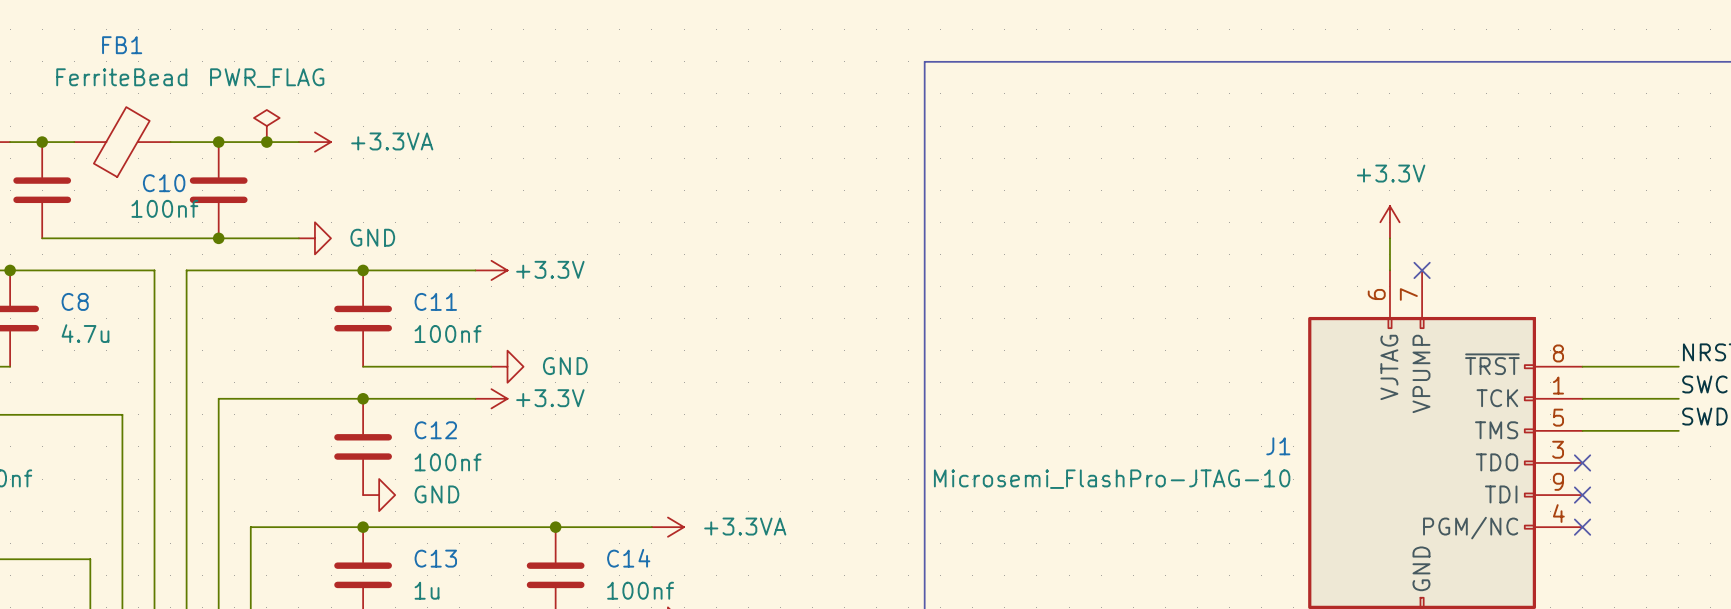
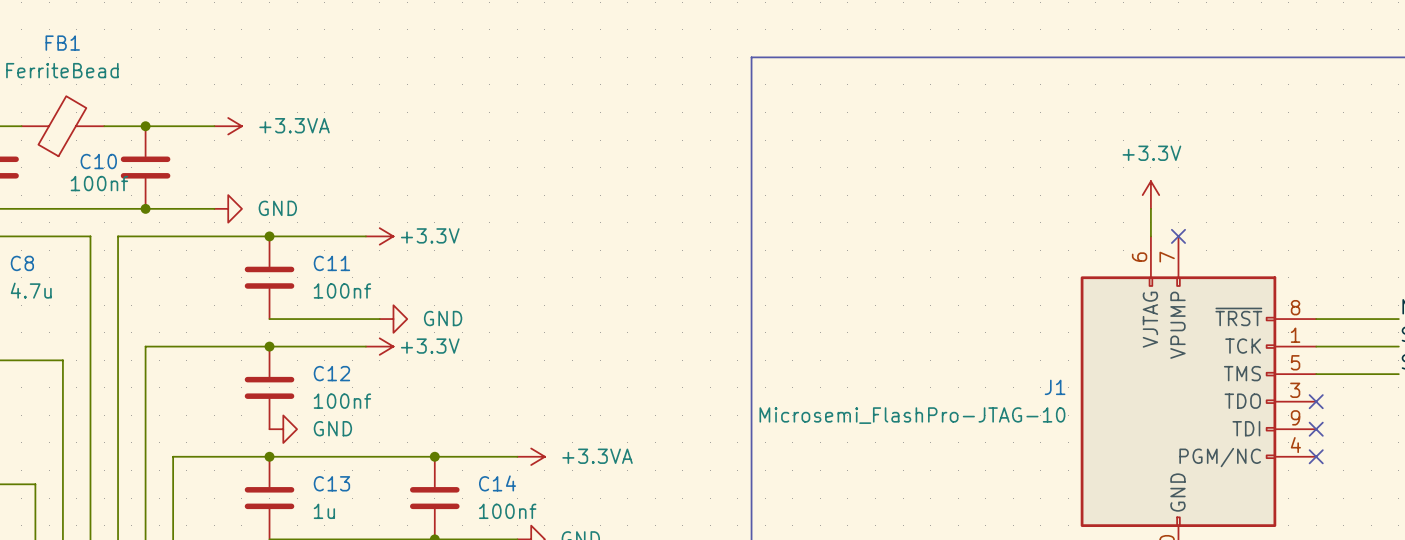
power symbol: PWR_FLAG (266, 126) -> none
junction: (266, 142) -> none

